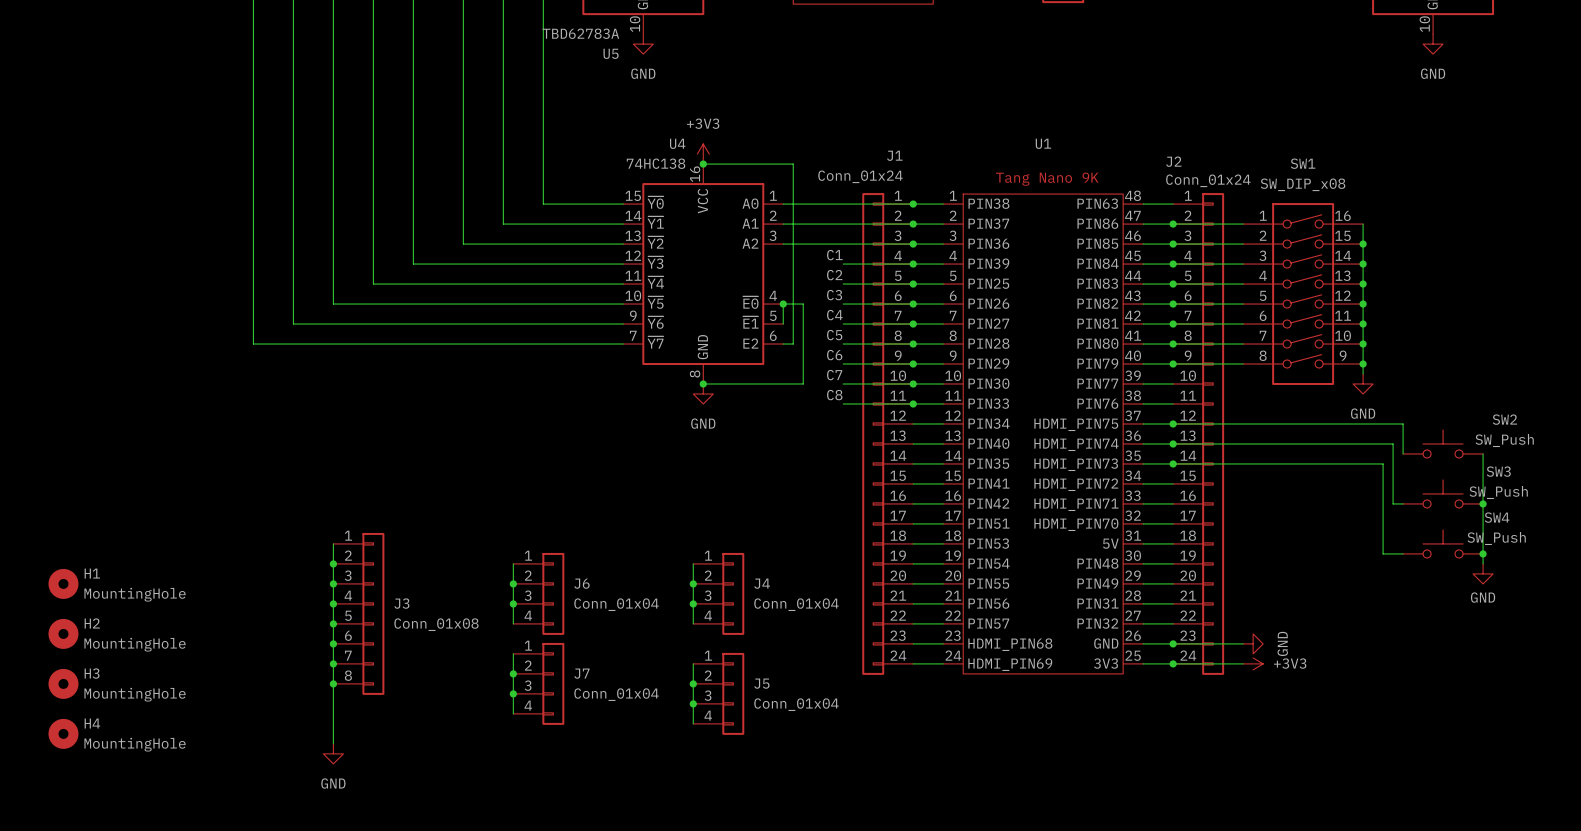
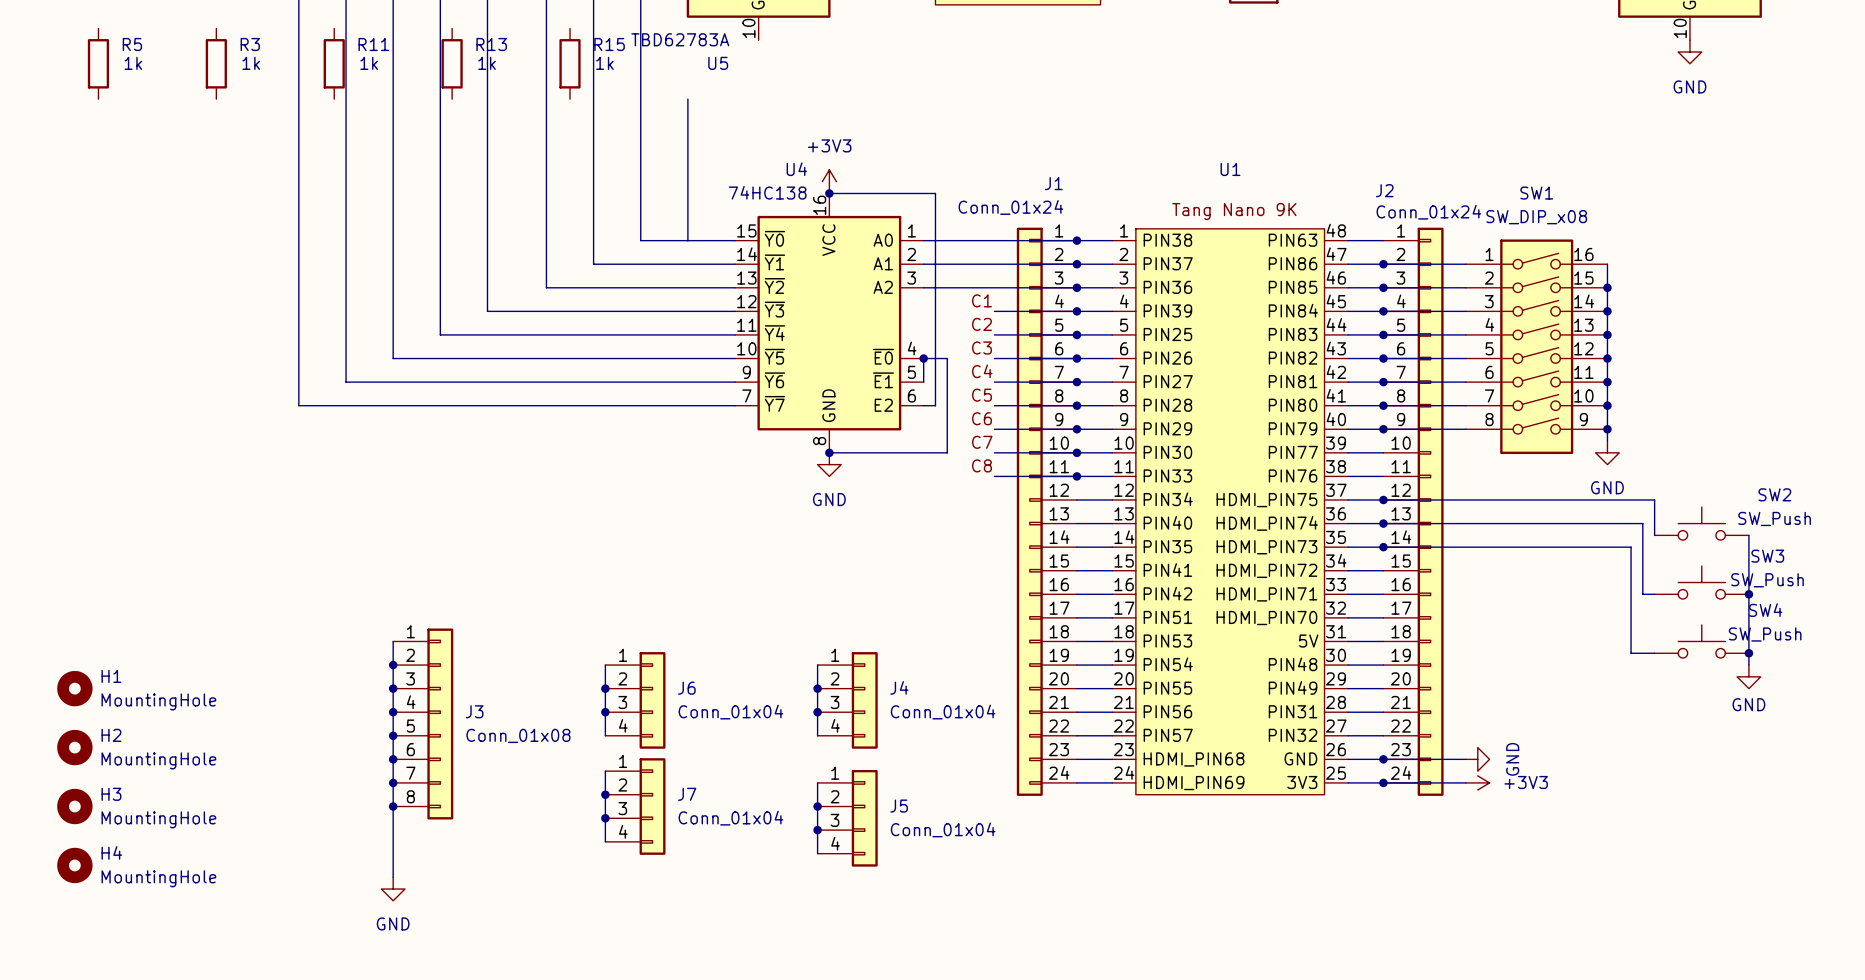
power symbol: GND (643, 44) -> none
R5: none -> 1k (98, 63)
R3: none -> 1k (216, 63)
R11: none -> 1k (334, 63)
R13: none -> 1k (452, 63)
R15: none -> 1k (570, 63)
wire: none -> (687, 99) (687, 240)

